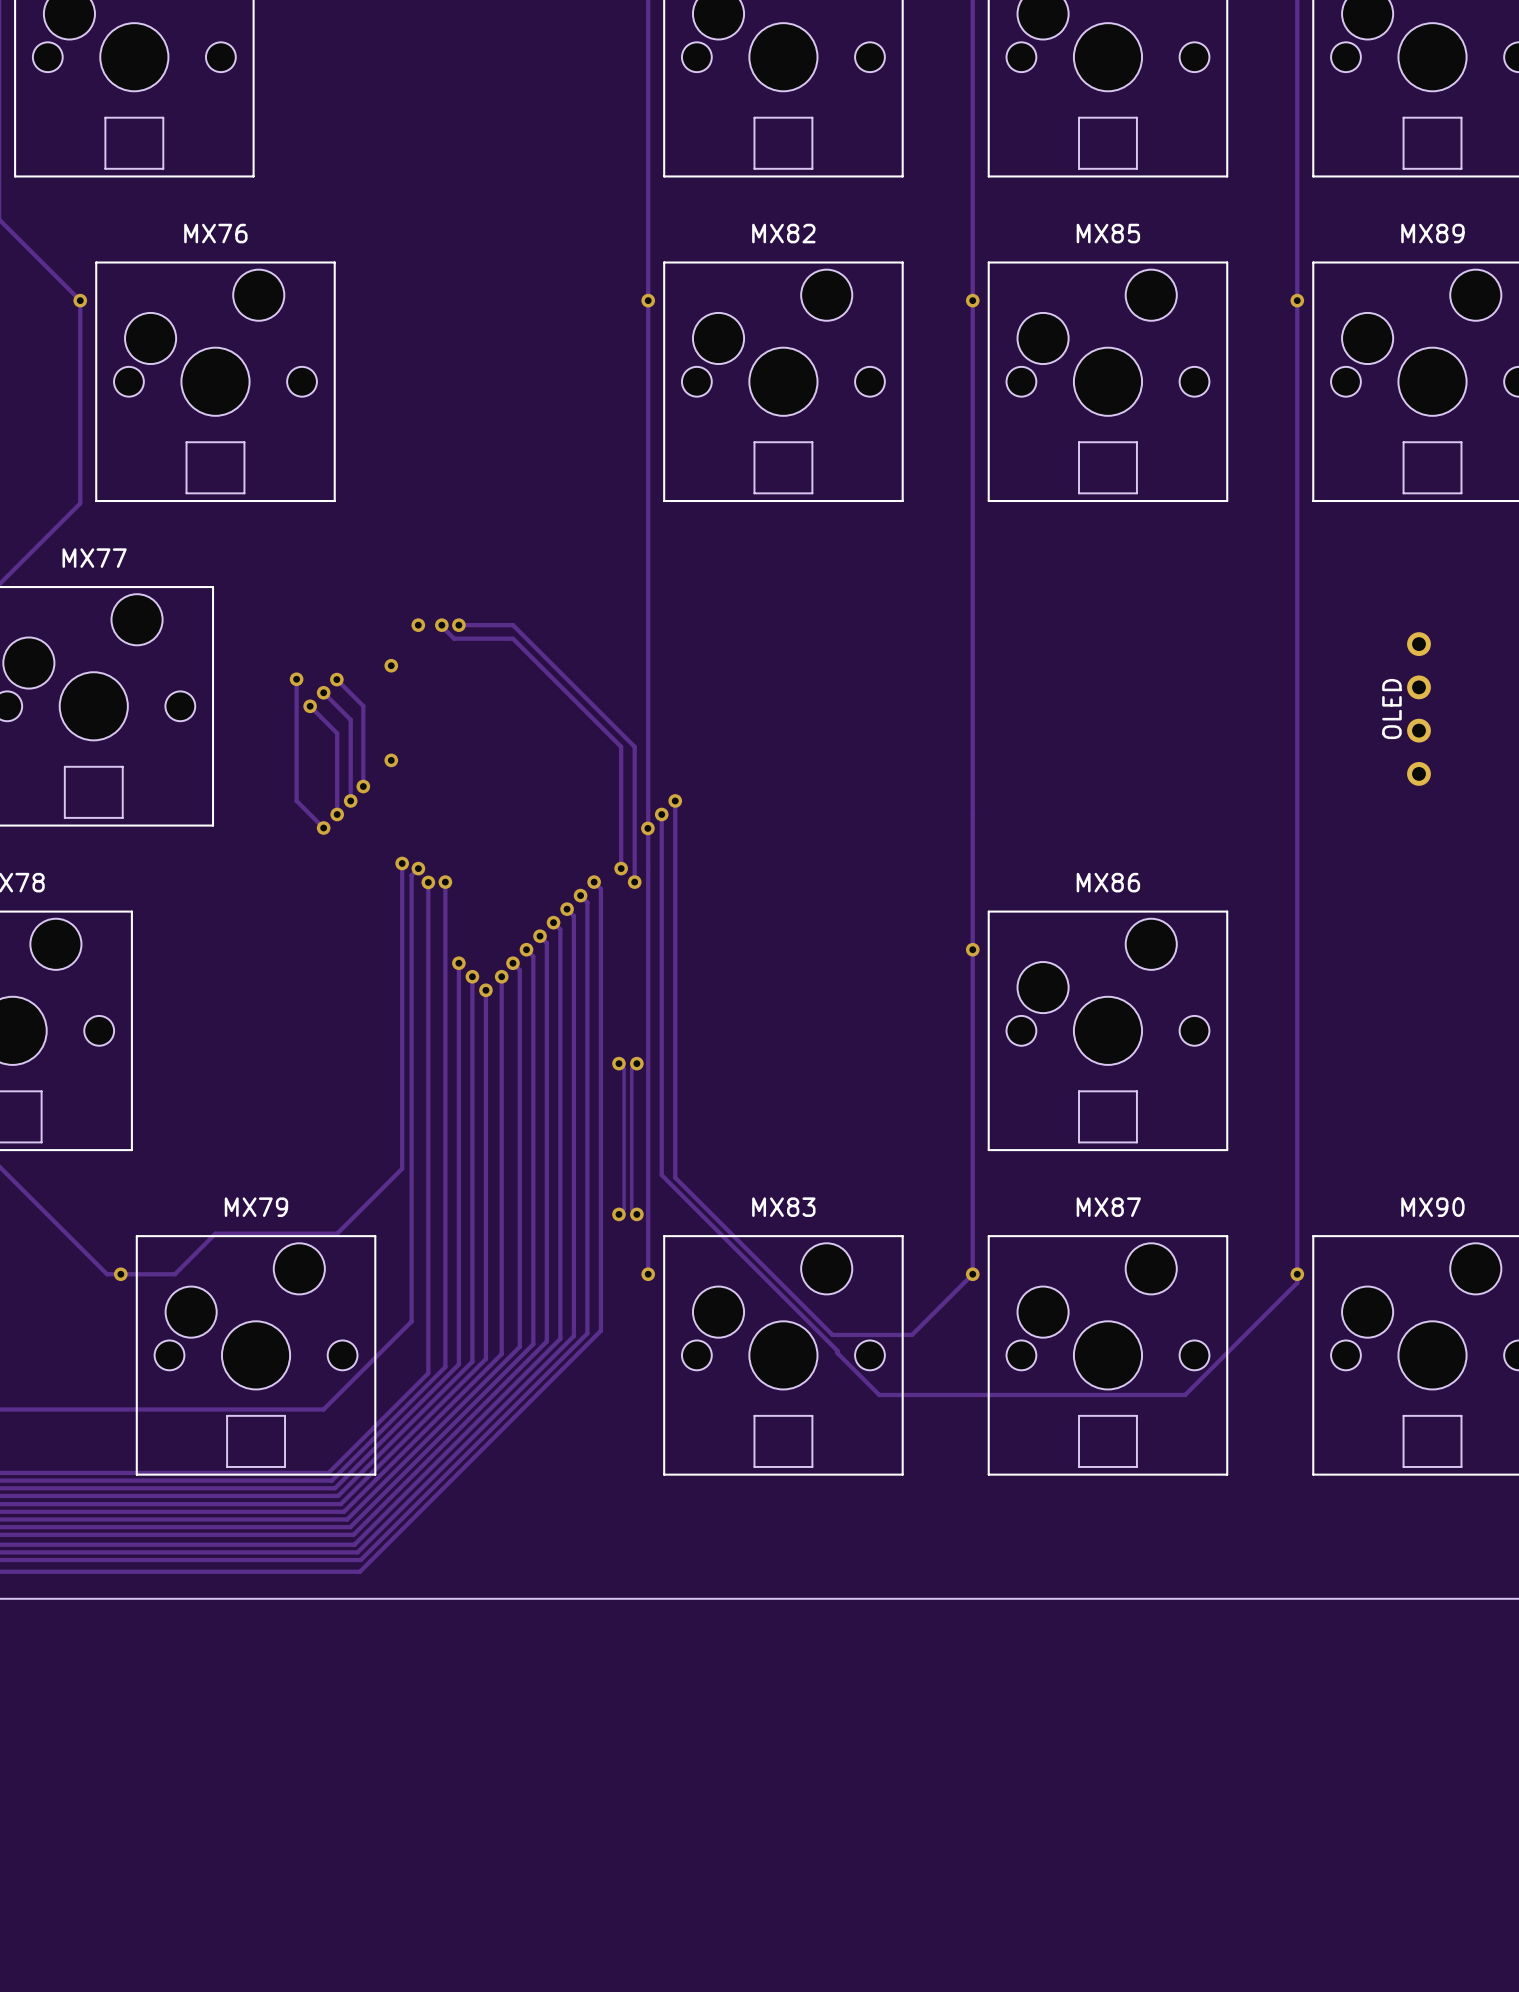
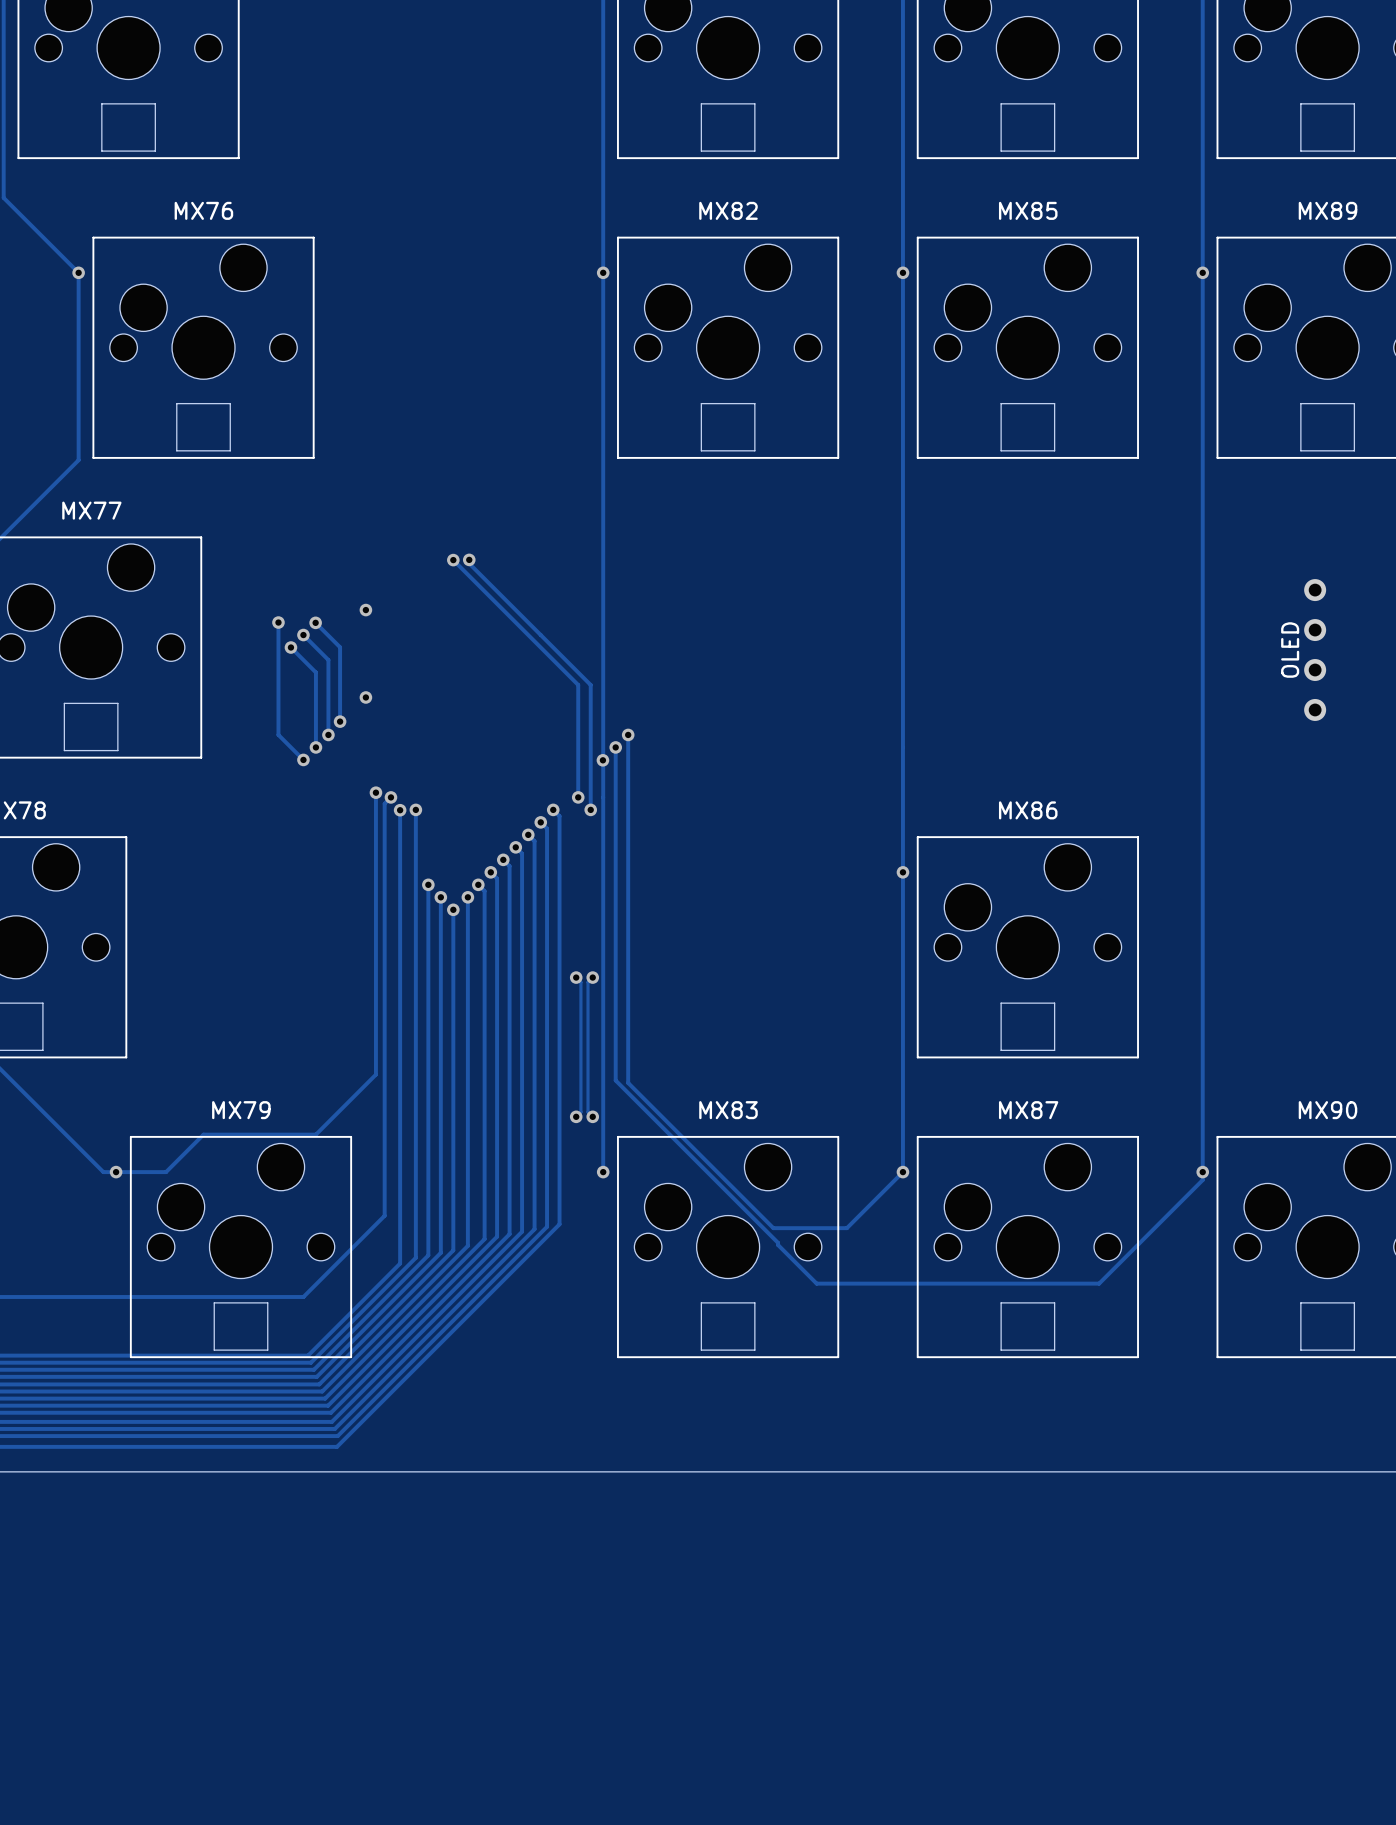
via: none -> (453, 560)
via: none -> (469, 559)
via: (418, 625) -> none
track: (441, 625) (454, 638) (512, 638) -> (453, 560) (478, 585)
via: (441, 625) -> none
track: (458, 625) (512, 625) -> (469, 559) (469, 563) (478, 572)
via: (458, 625) -> none

